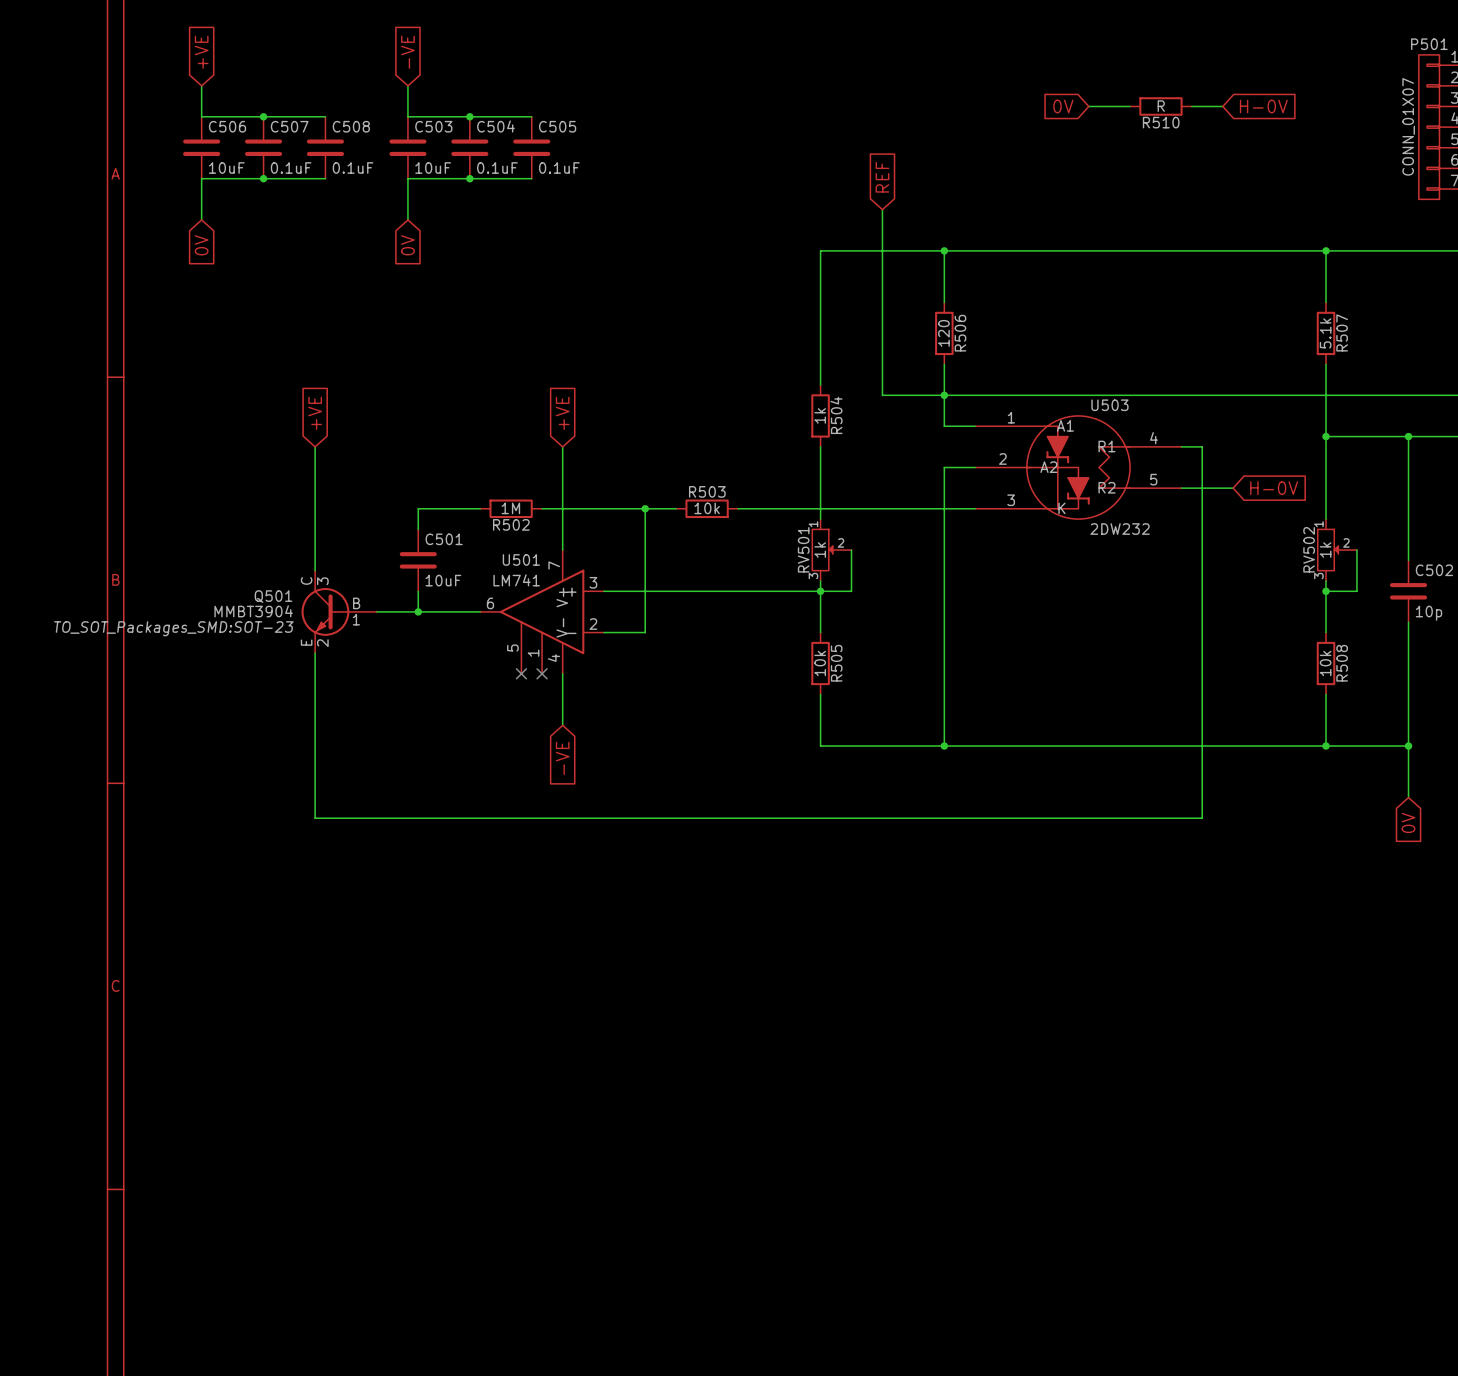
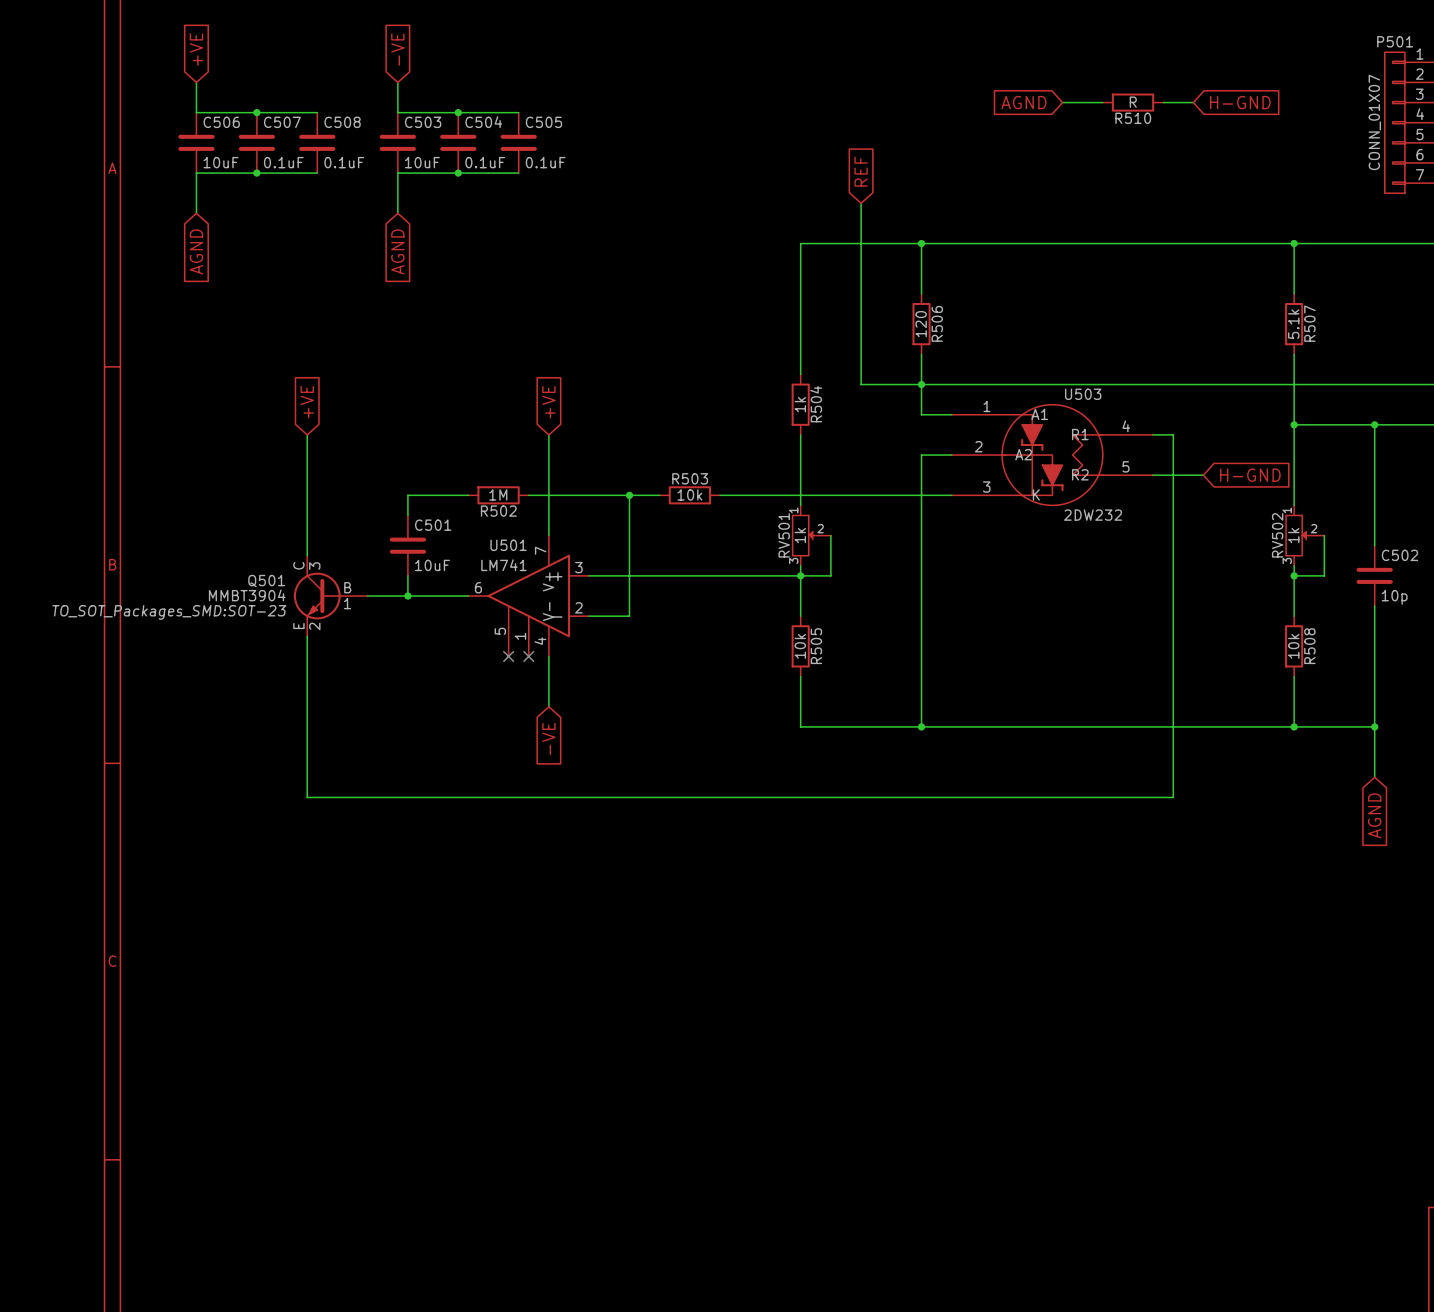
global label: 0V (1063, 106) -> AGND (1023, 102)
global label: H-0V (1263, 106) -> H-GND (1240, 102)
global label: 0V (201, 245) -> AGND (196, 251)
global label: 0V (407, 245) -> AGND (397, 251)
global label: H-0V (1274, 488) -> H-GND (1250, 475)
global label: 0V (1408, 822) -> AGND (1374, 815)

